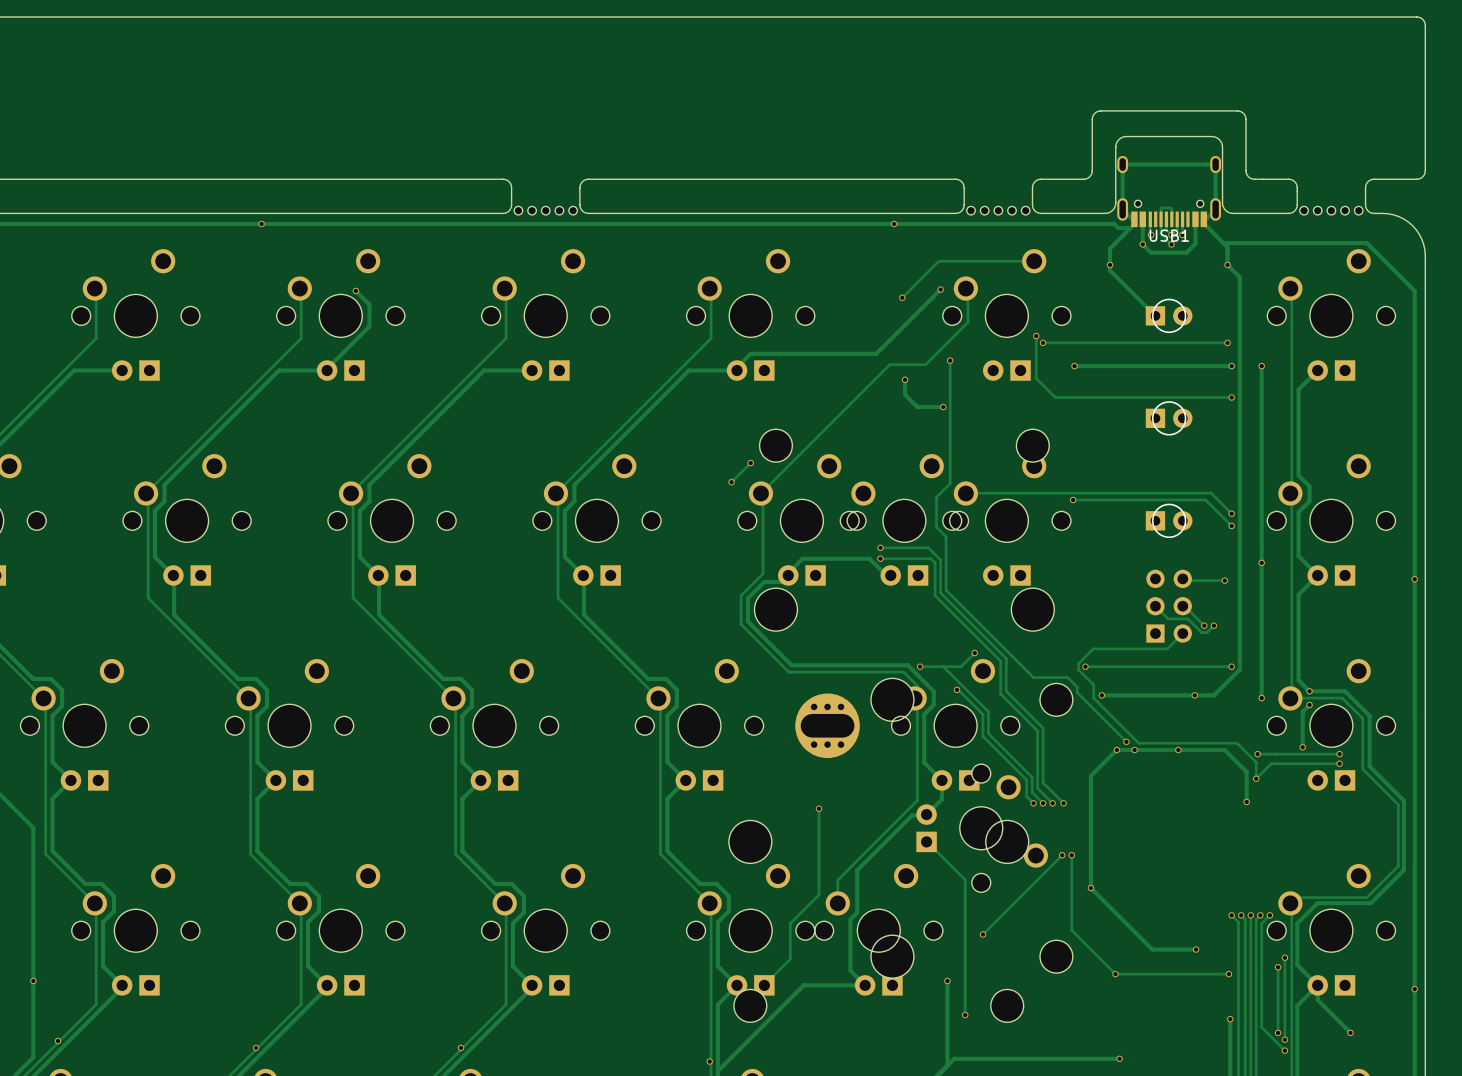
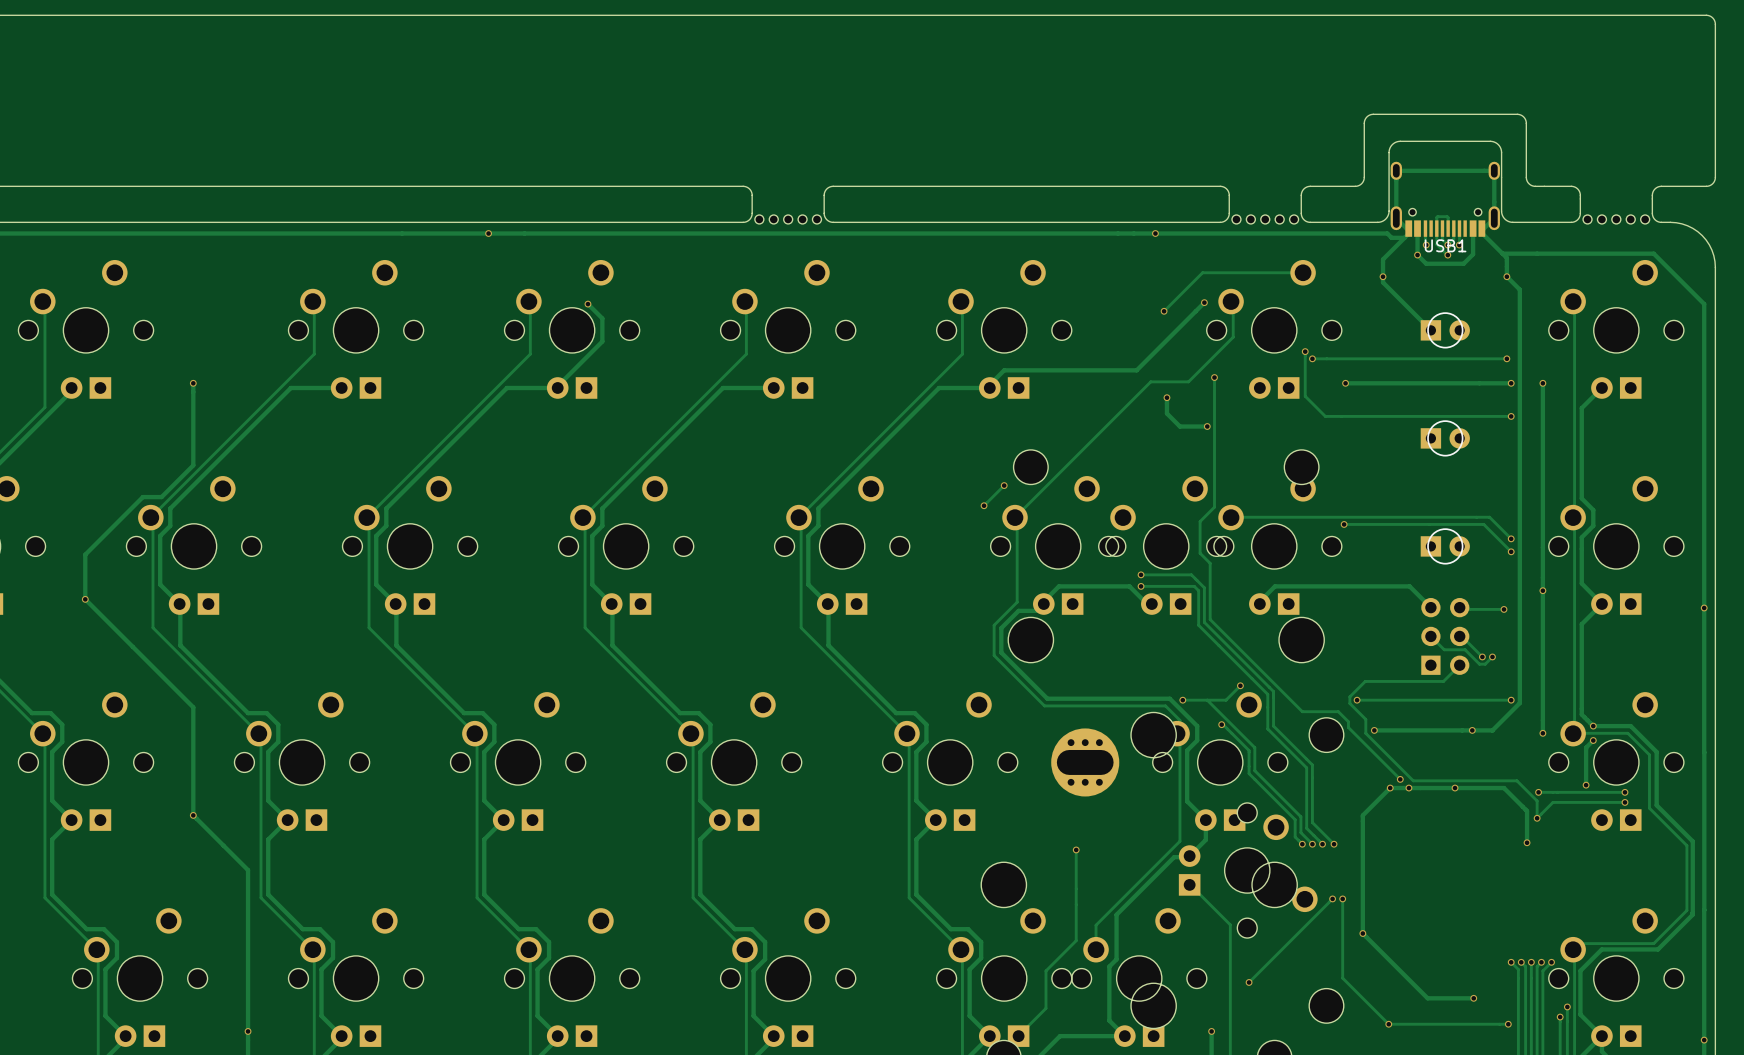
track: none -> (1259, 604) (1259, 601) (1274, 586) (1409, 586) (1430, 607)

